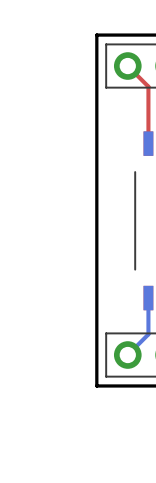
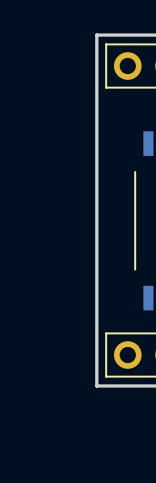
top track: (127, 66) (148, 86) (148, 143) -> none
bottom track: (148, 298) (148, 334) (127, 355) -> none

